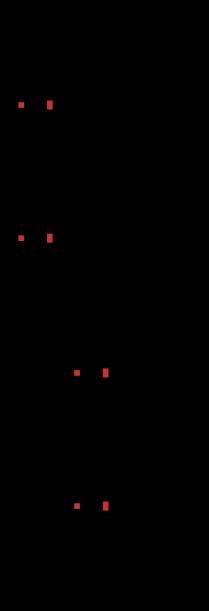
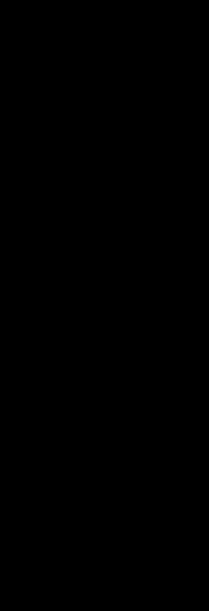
part: (35, 105) -> none
part: (35, 238) -> none
part: (91, 372) -> none
part: (91, 506) -> none

